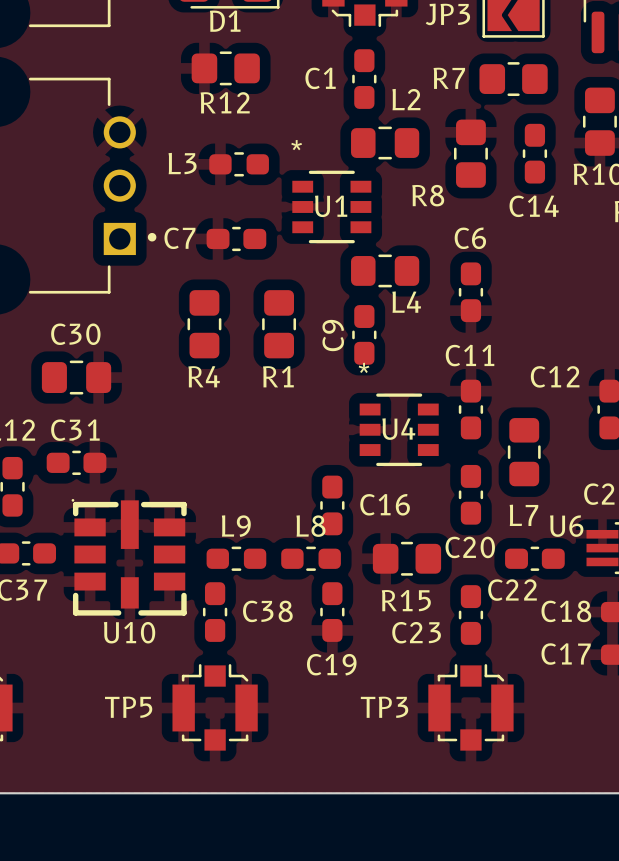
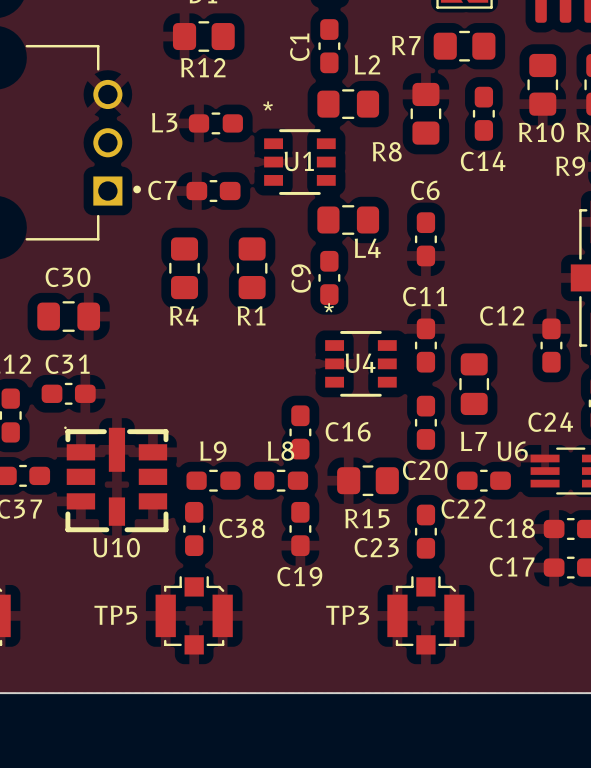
C1 name rotation: 0° (320, 78) -> 90° counterclockwise (299, 47)

